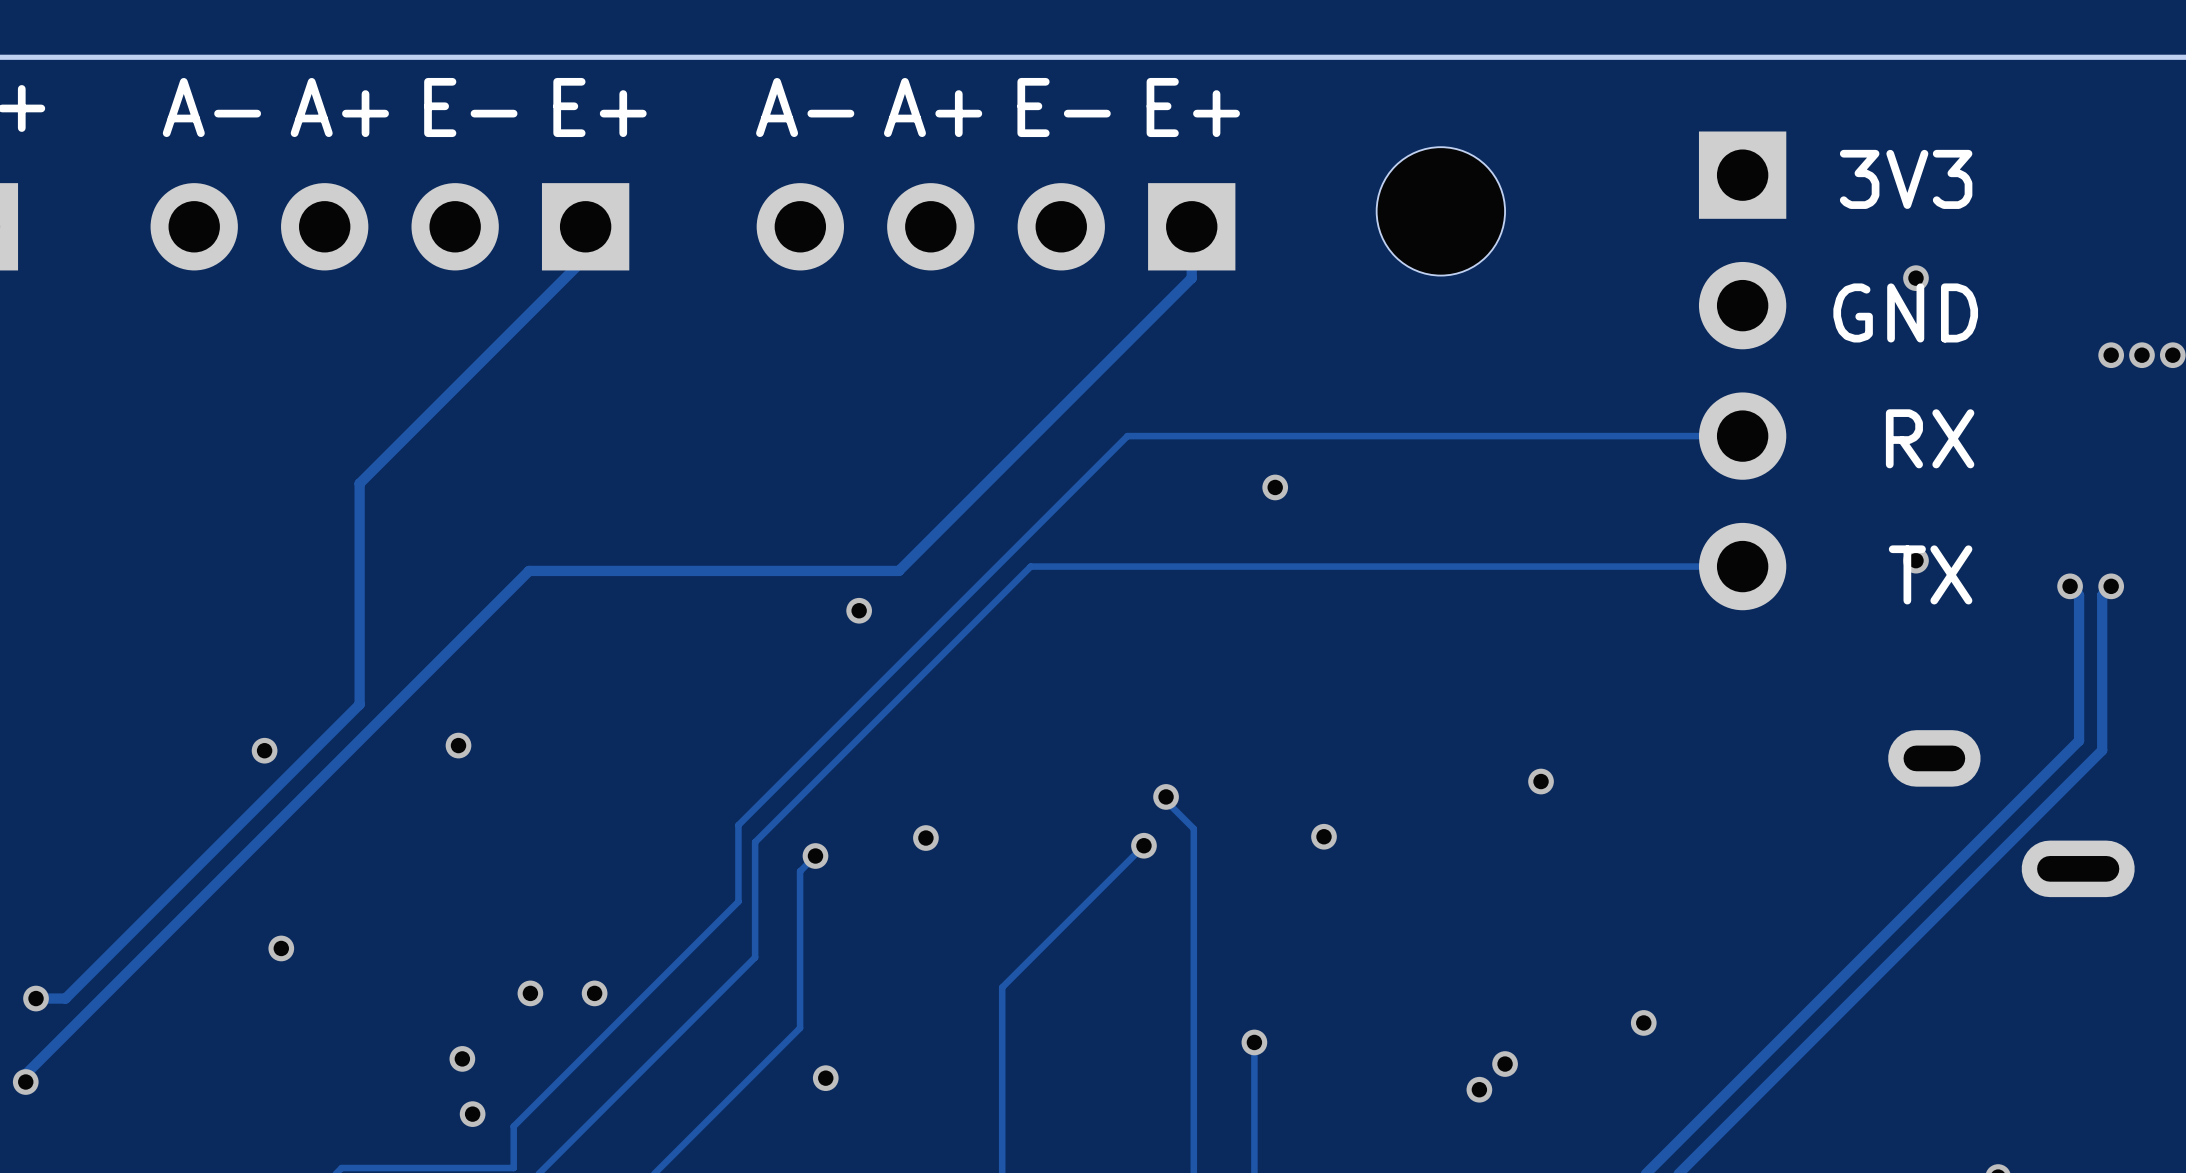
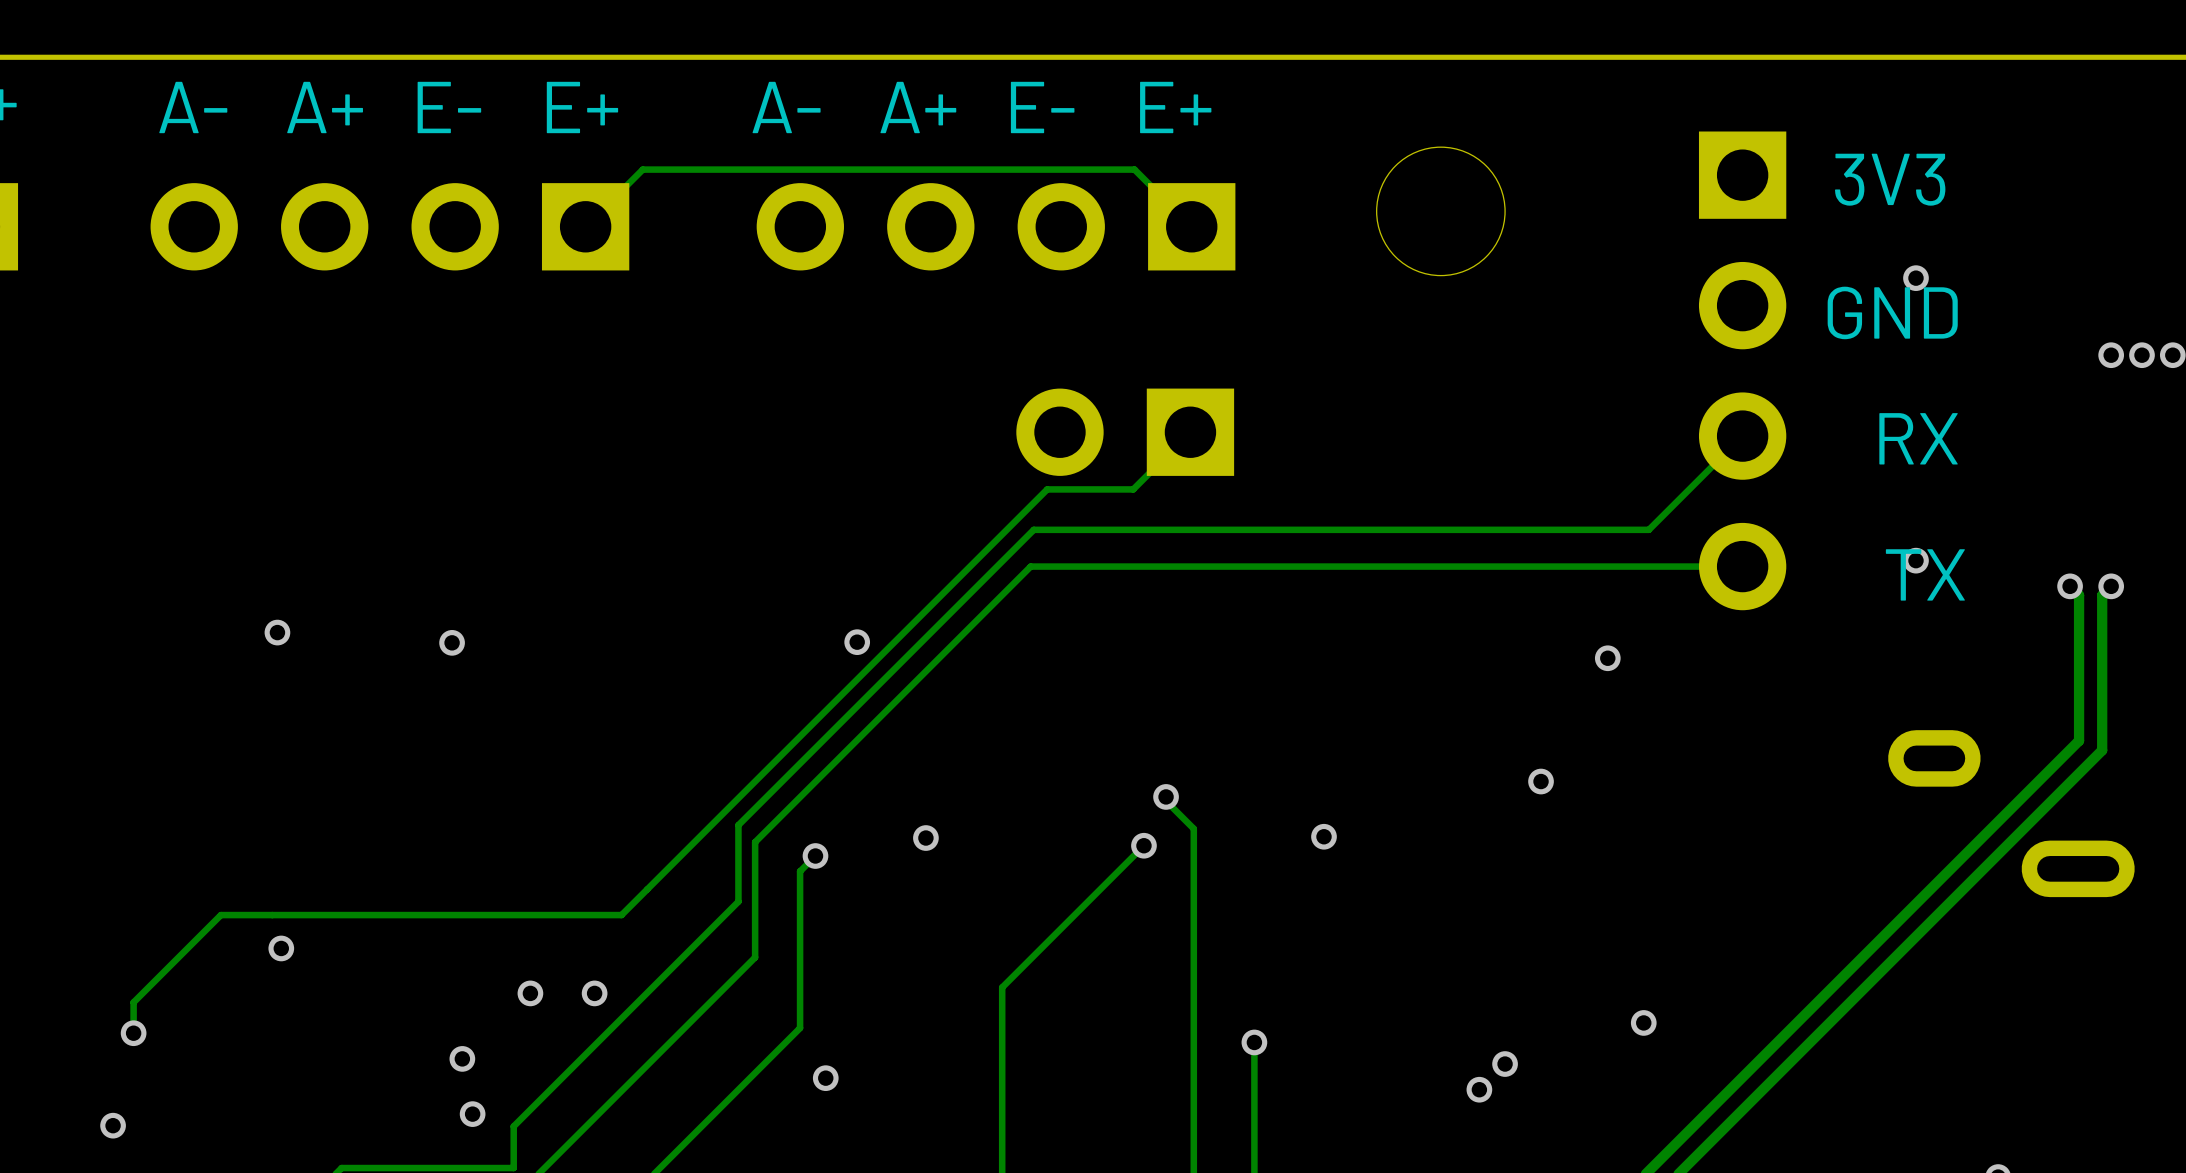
track: (585, 226) (585, 257) (359, 483) (359, 704) (65, 998) (36, 998) -> none
track: (1191, 226) (1191, 278) (898, 570) (529, 570) (25, 1074) (25, 1082) -> (1191, 226) (1134, 169) (642, 169) (585, 226)
part: none -> (1125, 432)
track: none -> (1190, 432) (1133, 489) (1047, 489) (621, 915) (220, 915) (133, 1002) (133, 1033)
track: (1742, 436) (1127, 436) (1033, 529) -> (1742, 436) (1648, 529) (1033, 529)
via: (1275, 487) -> none
via position: (859, 610) -> (857, 642)
via: none -> (277, 632)
via: none -> (1607, 658)
via position: (458, 745) -> (452, 642)
via: (264, 750) -> none
via: (36, 998) -> none
via: none -> (133, 1033)
via: (25, 1082) -> none
via: none -> (113, 1125)

